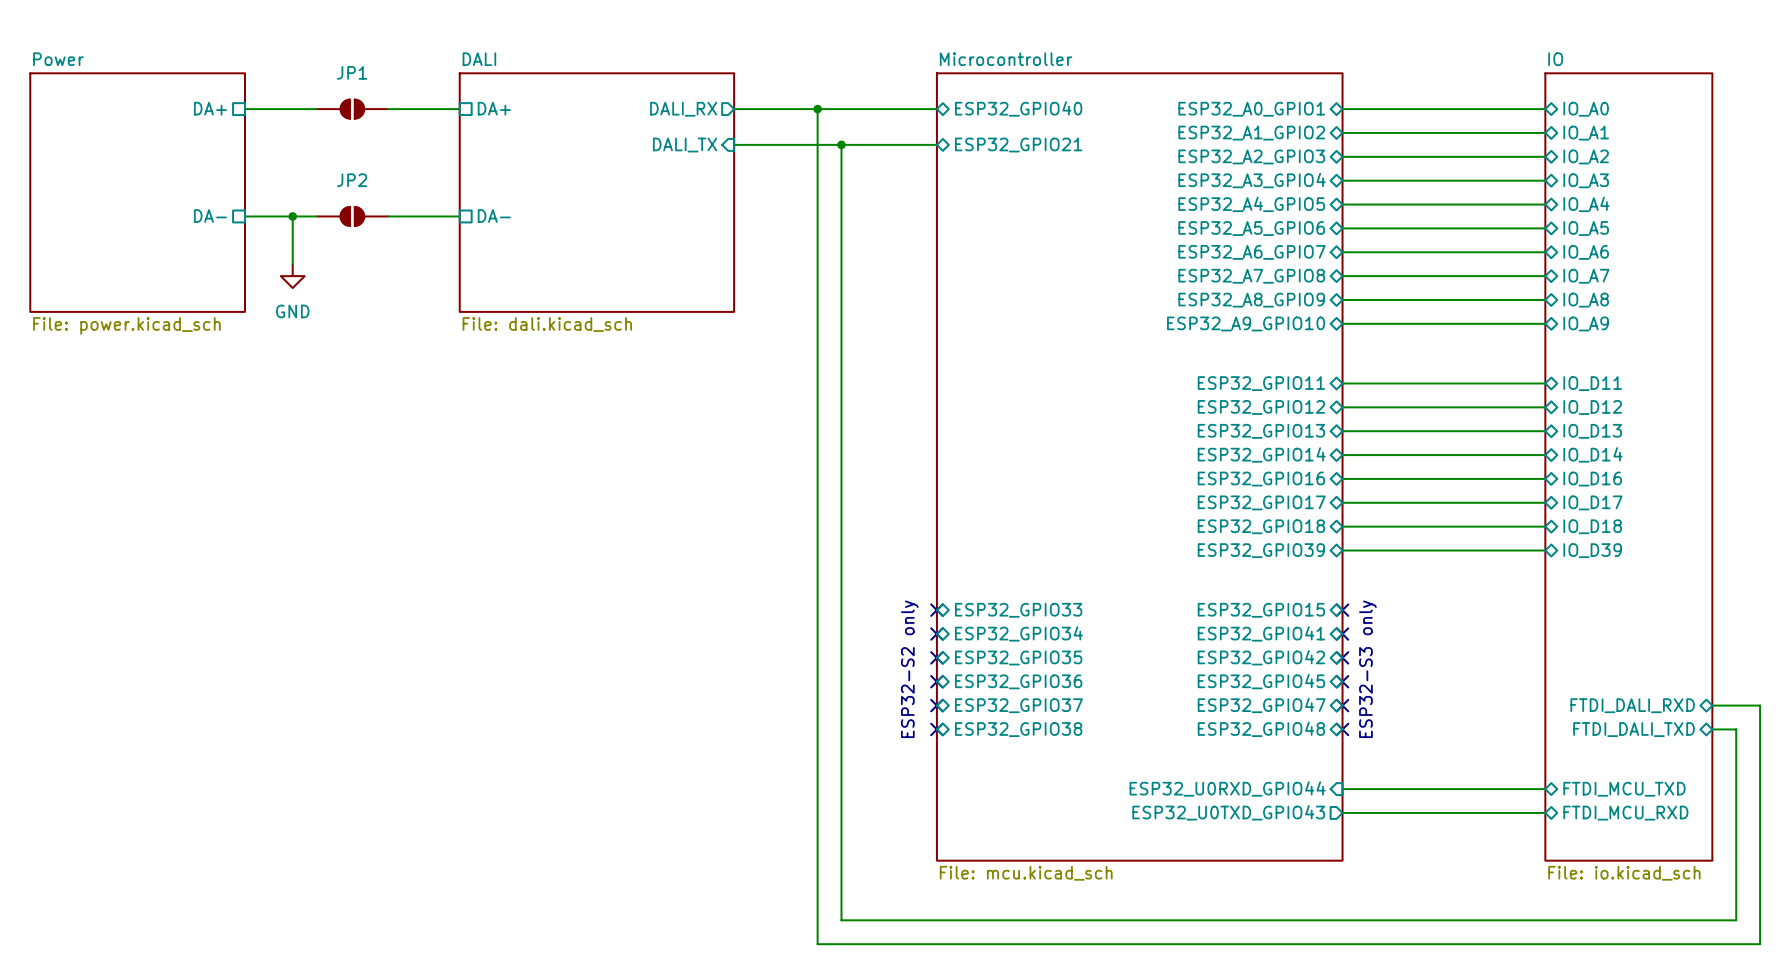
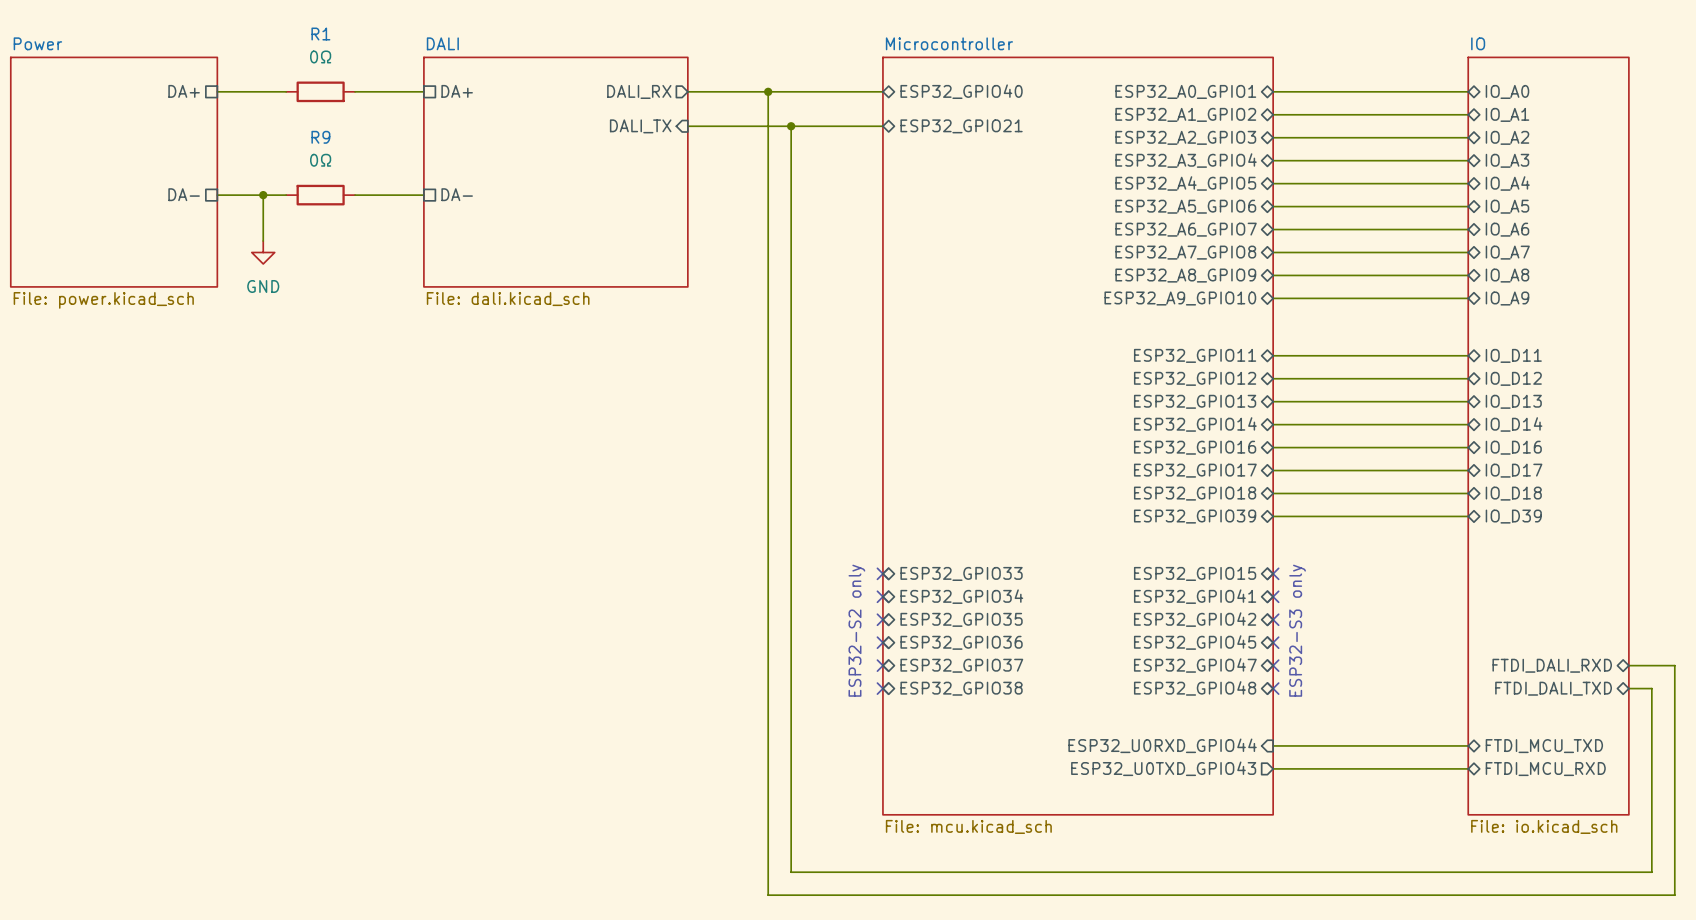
JP1: (352, 109) -> none
R1: none -> 0Ω (320, 91)
JP2: (352, 216) -> none
R9: none -> 0Ω (320, 195)

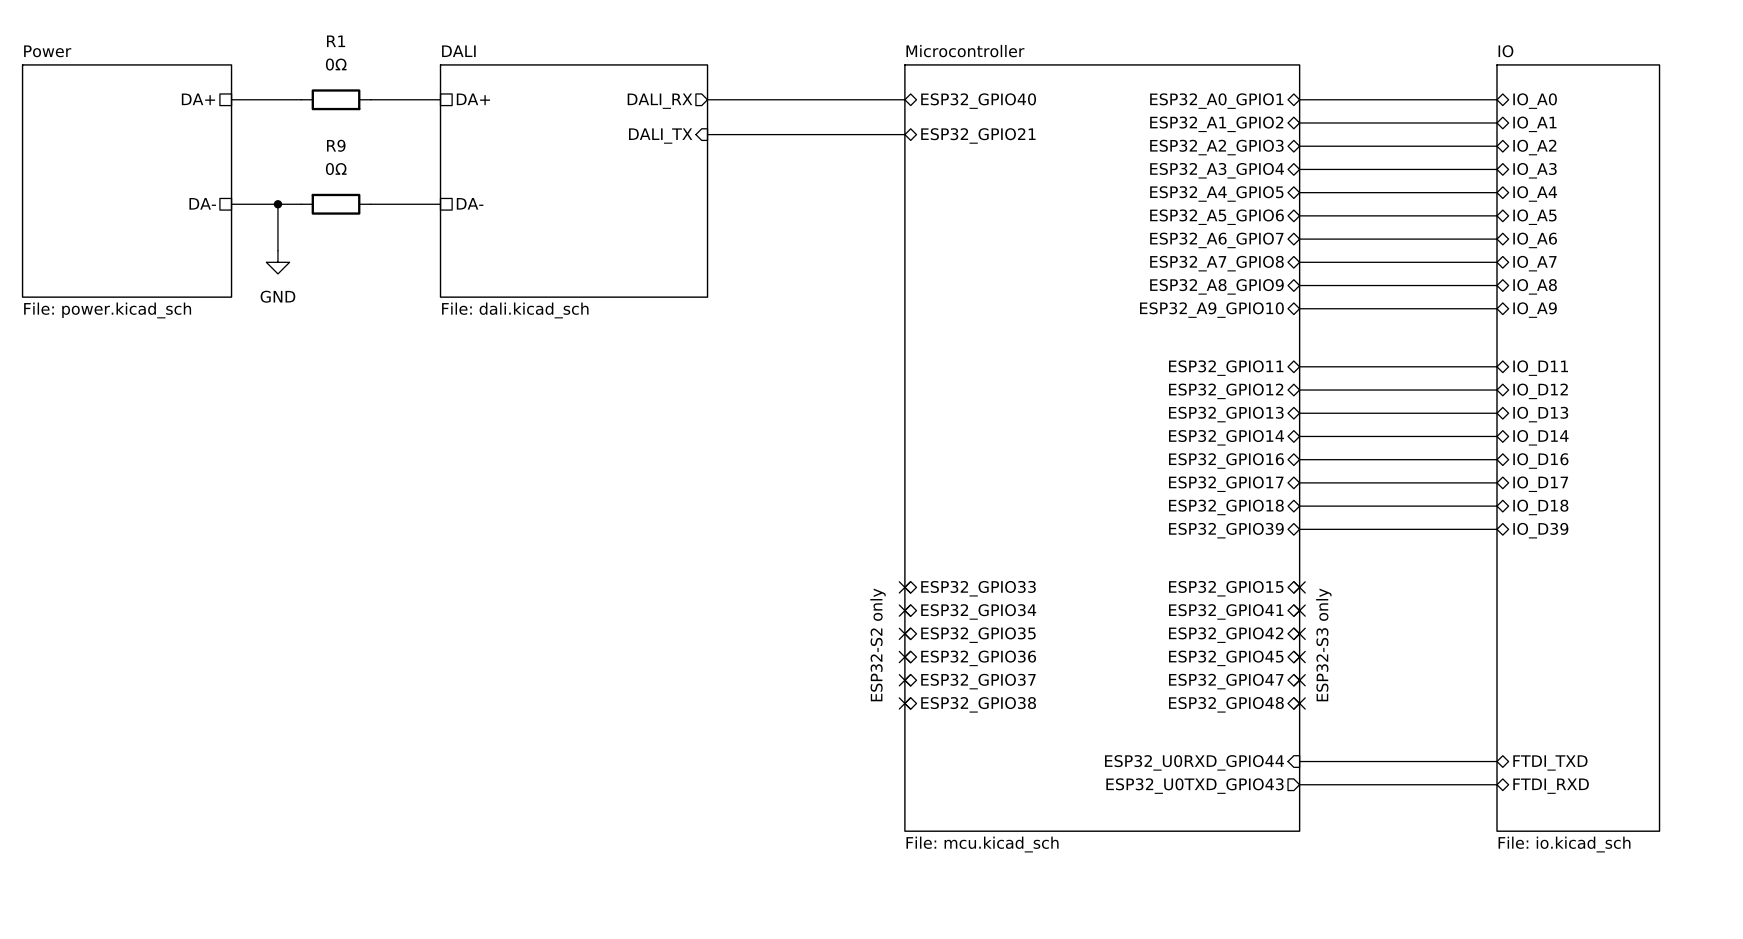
wire: (768, 91) (768, 895) (1674, 895) (1674, 665) (1628, 665) -> none
junction: (768, 91) -> none
wire: (791, 126) (791, 872) (1651, 872) (1651, 688) (1628, 688) -> none
junction: (791, 126) -> none
sheet pin: FTDI_DALI_RXD (1552, 665) -> none
sheet pin: FTDI_DALI_TXD (1553, 688) -> none
sheet pin: FTDI_MCU_TXD (1544, 746) -> FTDI_TXD (1550, 762)
sheet pin: FTDI_MCU_RXD (1545, 769) -> FTDI_RXD (1551, 786)

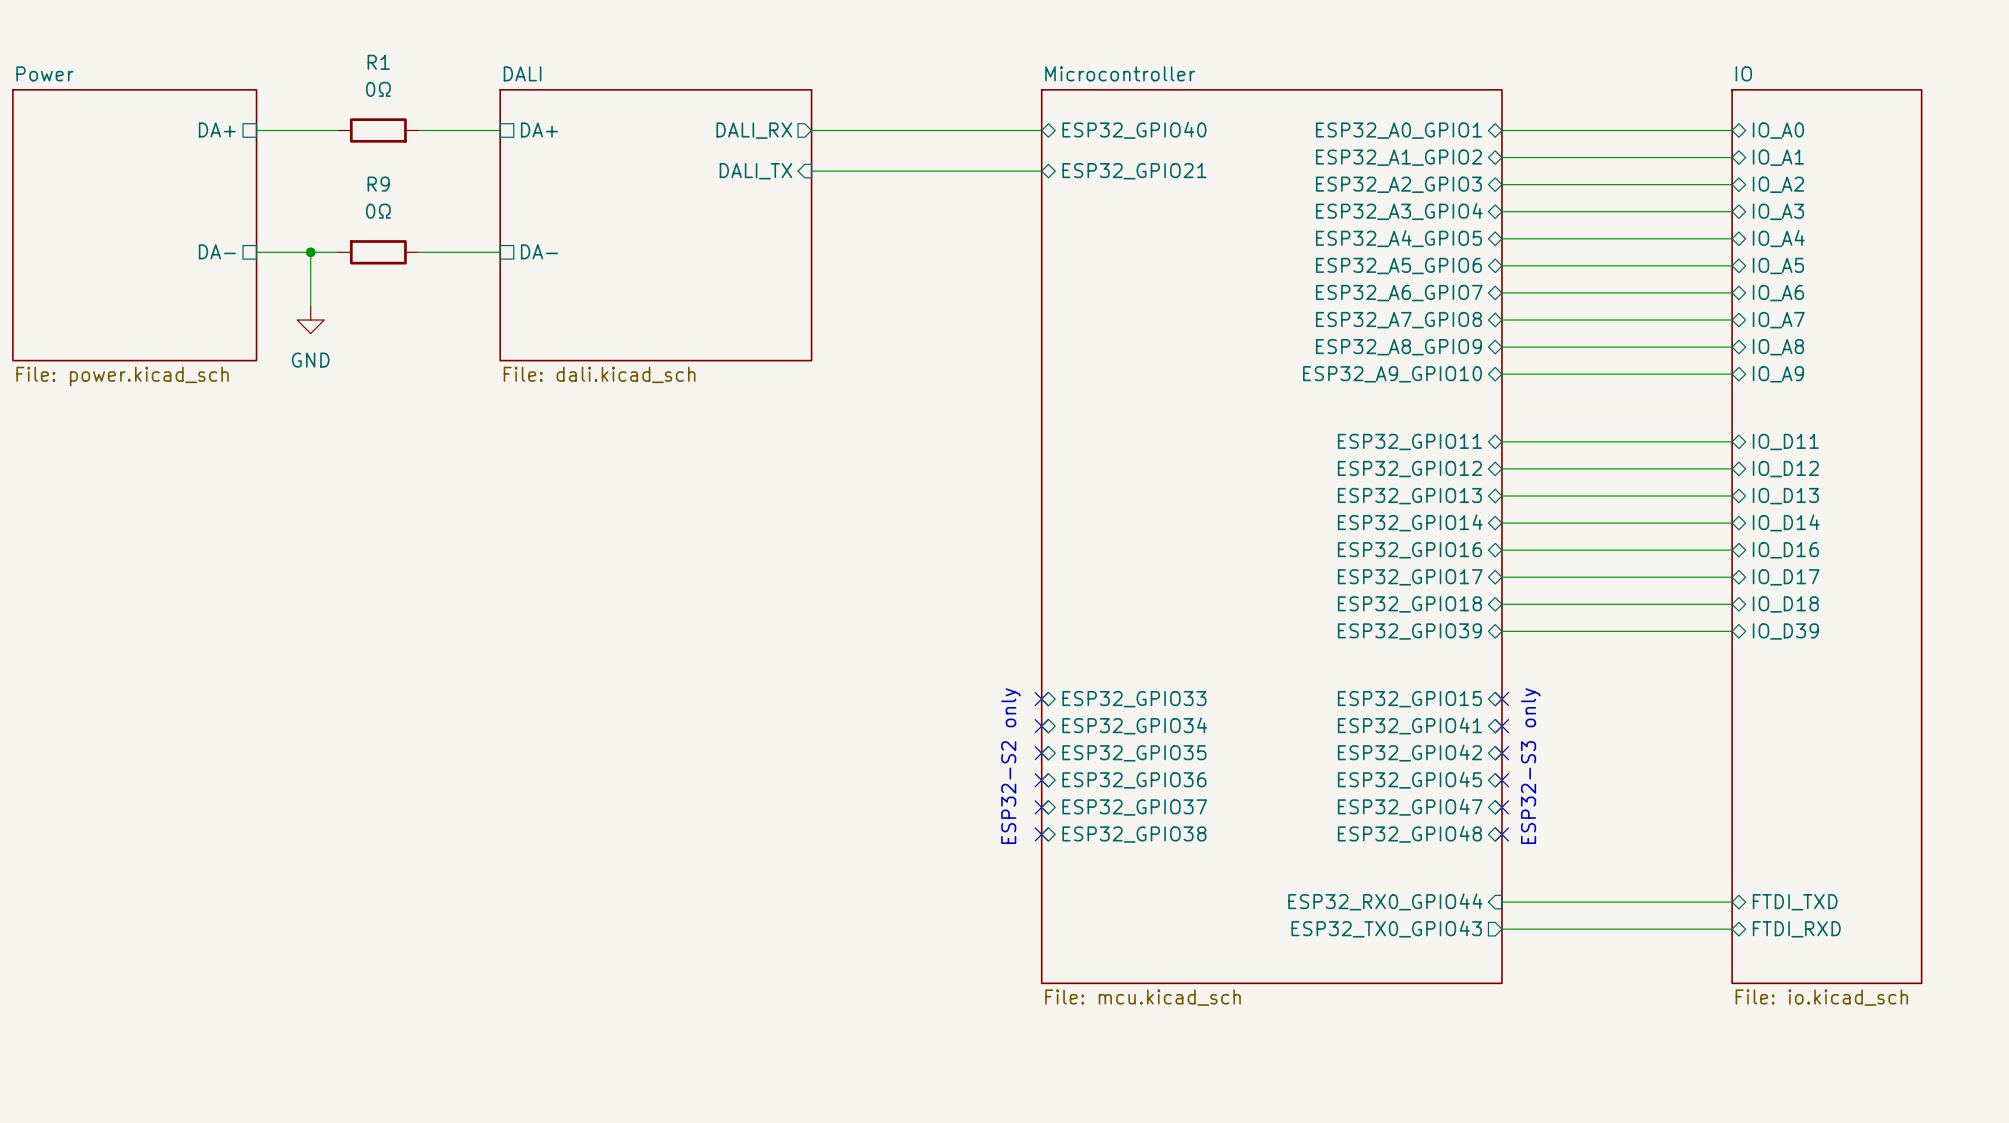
sheet pin: ESP32_U0RXD_GPIO44 (1194, 762) -> ESP32_RX0_GPIO44 (1385, 901)
sheet pin: ESP32_U0TXD_GPIO43 (1194, 786) -> ESP32_TX0_GPIO43 (1386, 929)

